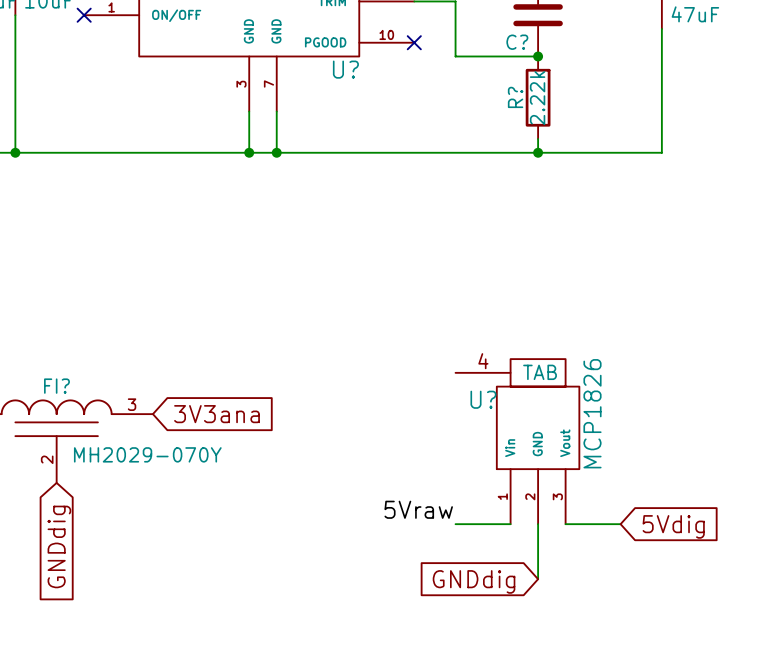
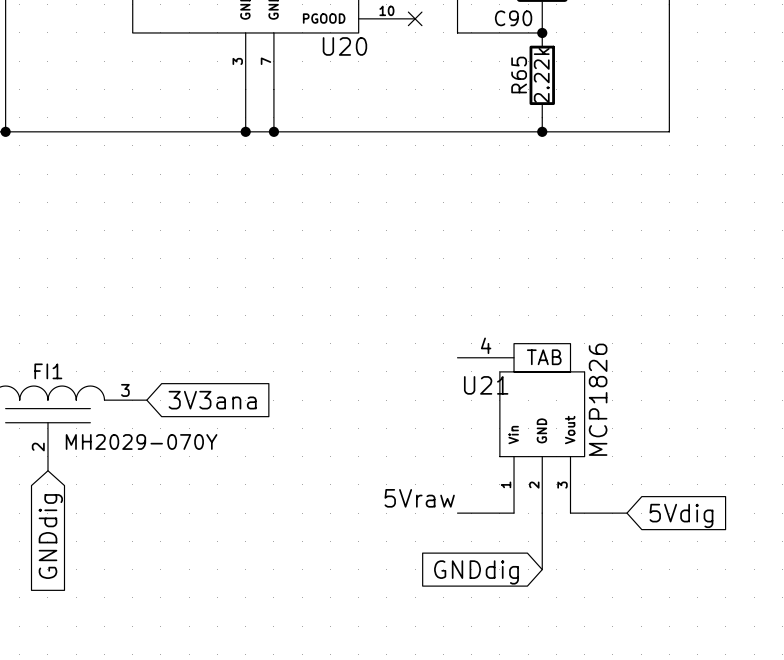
C? name: C? (517, 42) -> C90 (513, 18)
U? name: U? (345, 69) -> U20 (344, 46)
R? name: R? (515, 97) -> R65 (519, 75)
FI? name: FI? (56, 386) -> FI1 (48, 371)
U? name: U? (483, 399) -> U21 (486, 385)

